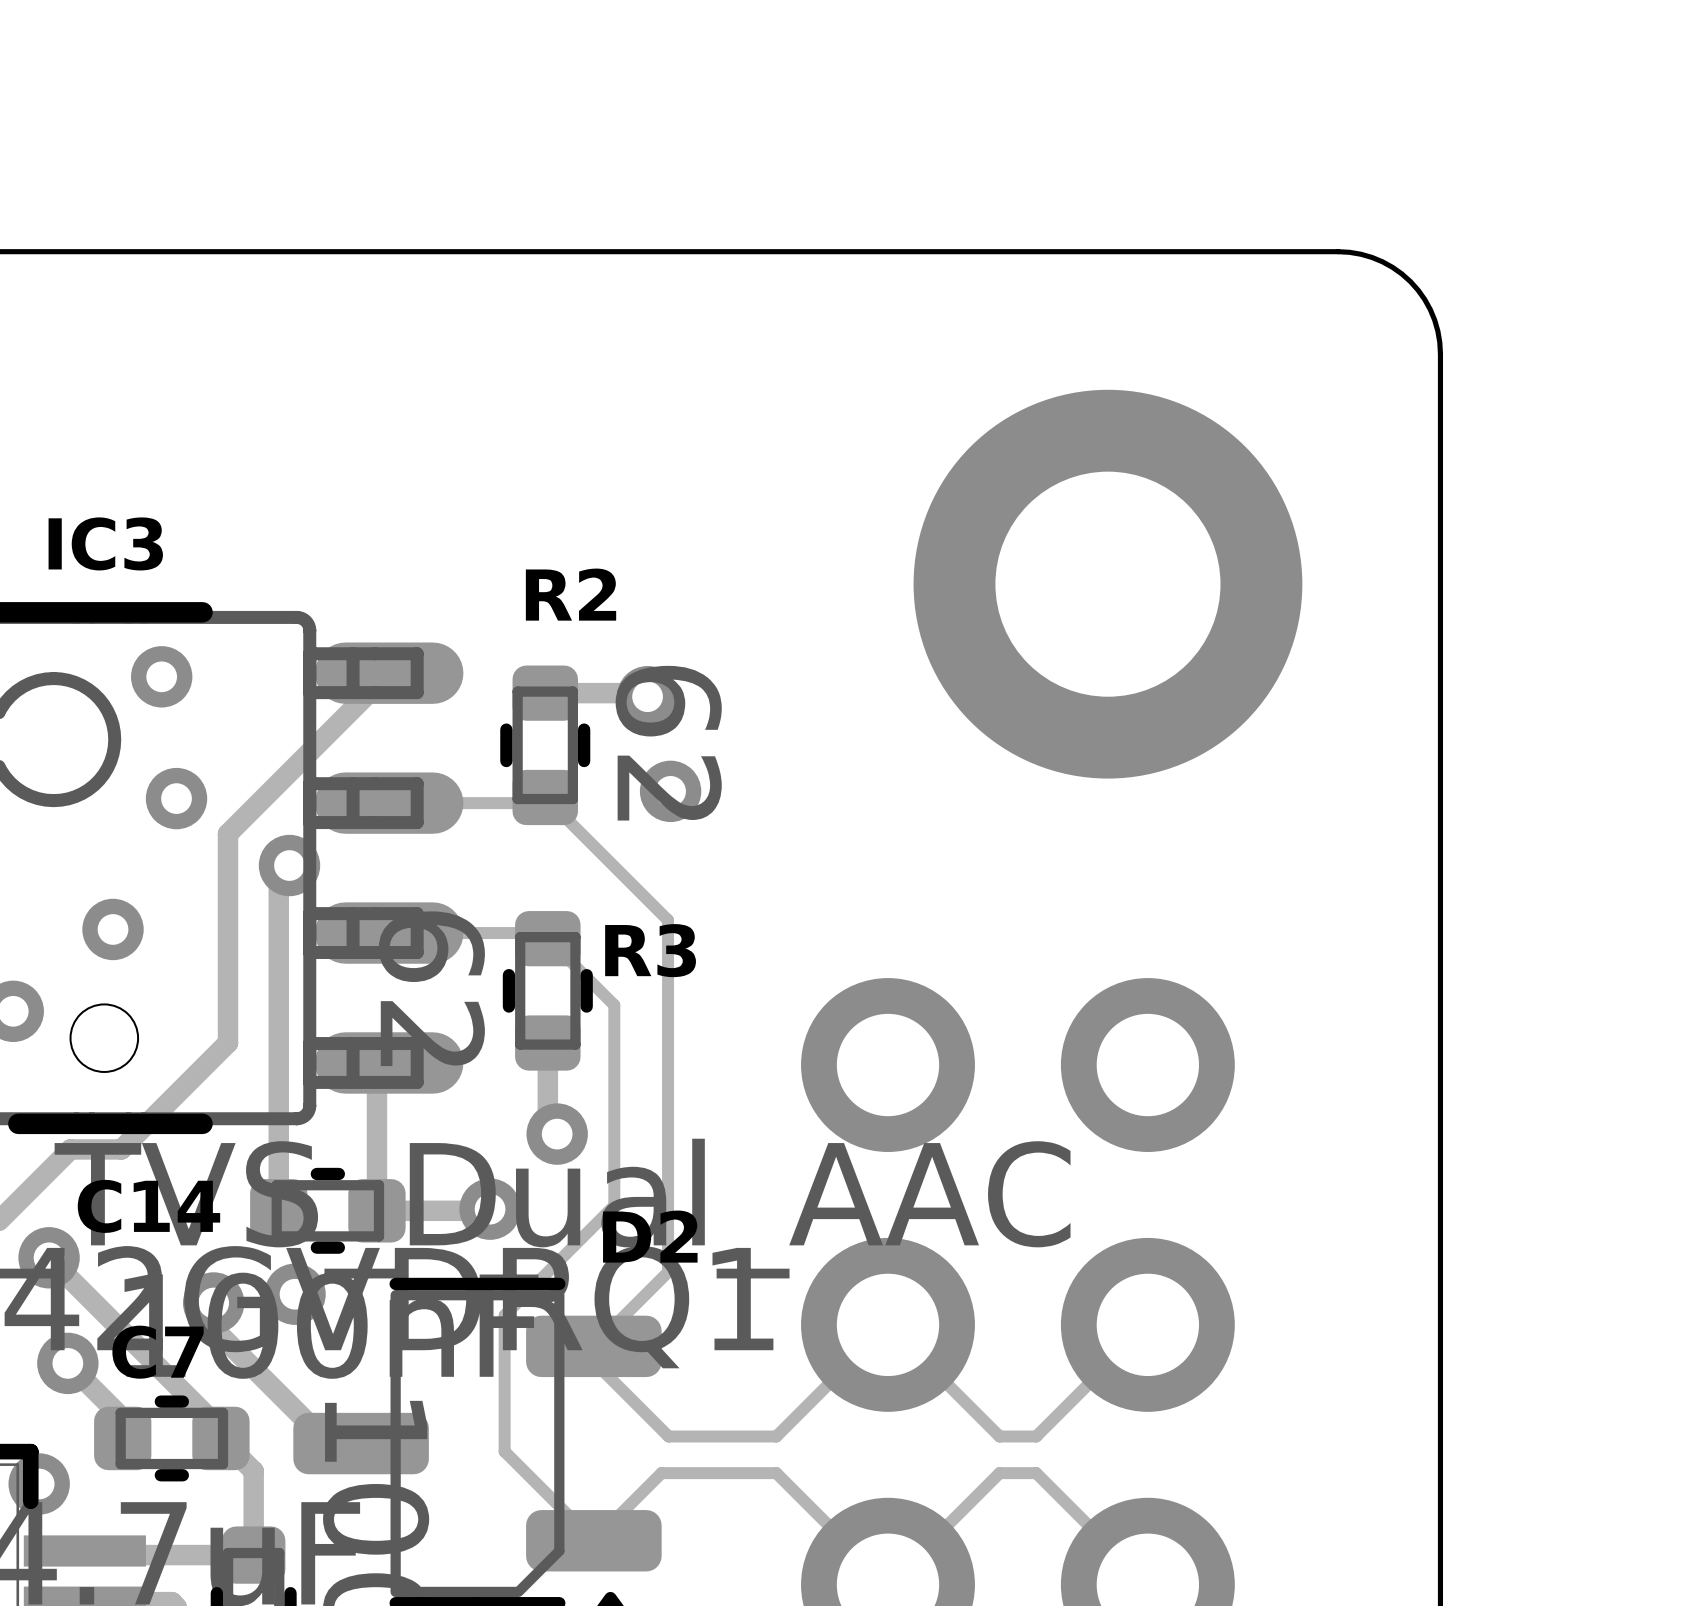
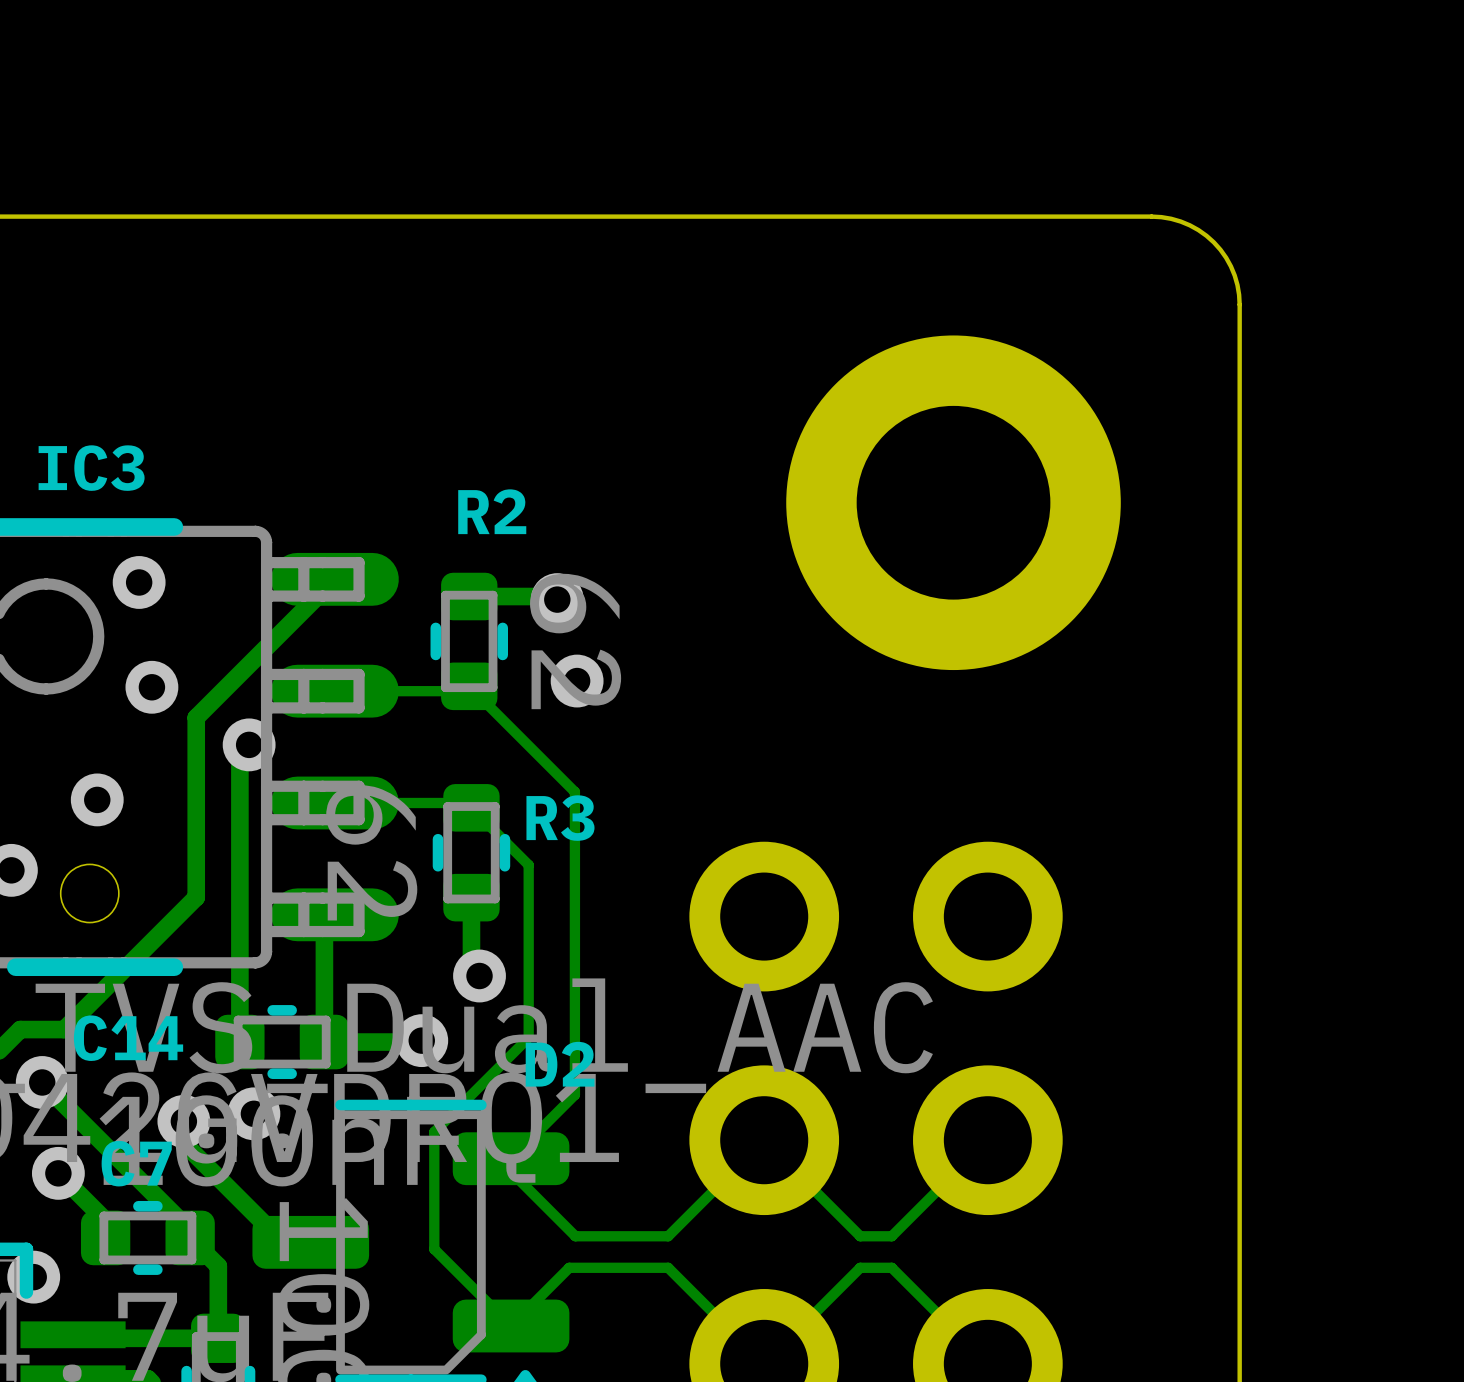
track: (121, 1149) (70, 1149) (23, 1196) -> (104, 989) (64, 1029) (20, 1029)

